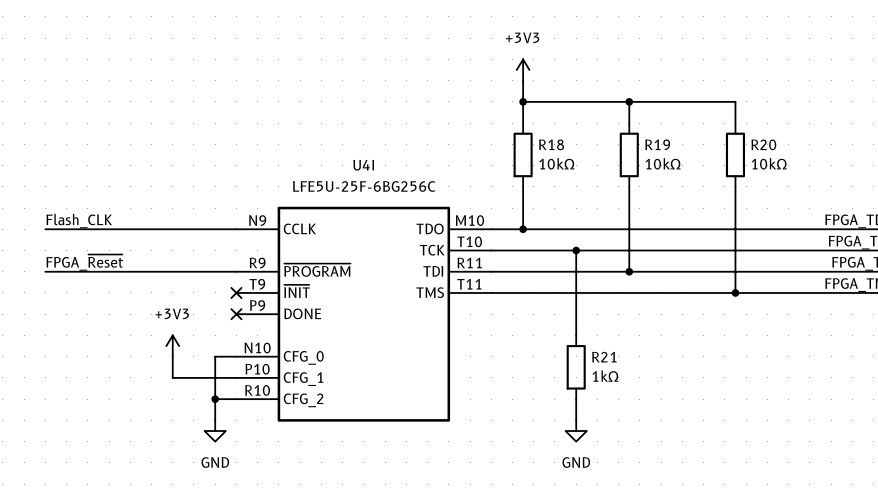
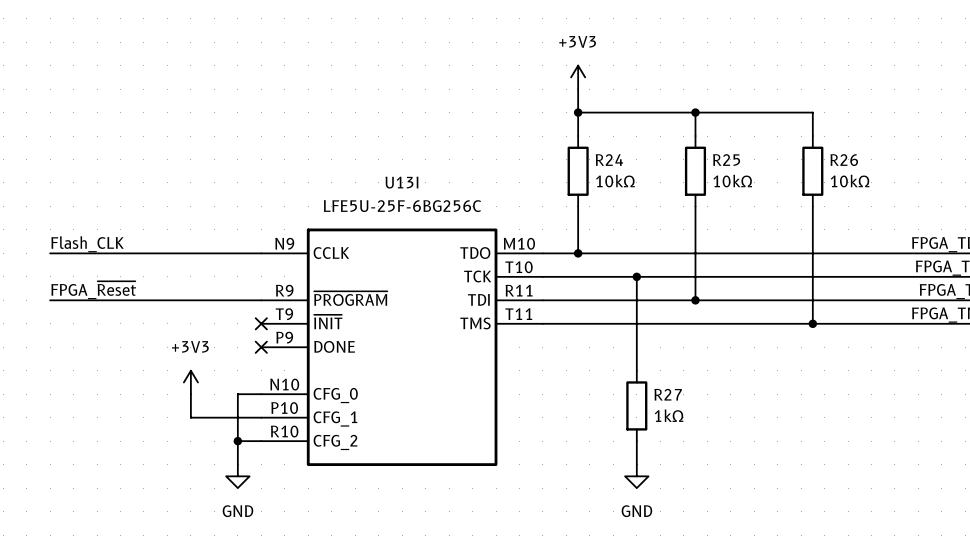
R18 name: R18 (551, 144) -> R24 (609, 160)
R19 name: R19 (657, 144) -> R25 (726, 160)
R20 name: R20 (763, 144) -> R26 (844, 160)
U4I name: U4I (363, 165) -> U13I (401, 182)
R21 name: R21 (604, 357) -> R27 (668, 394)

